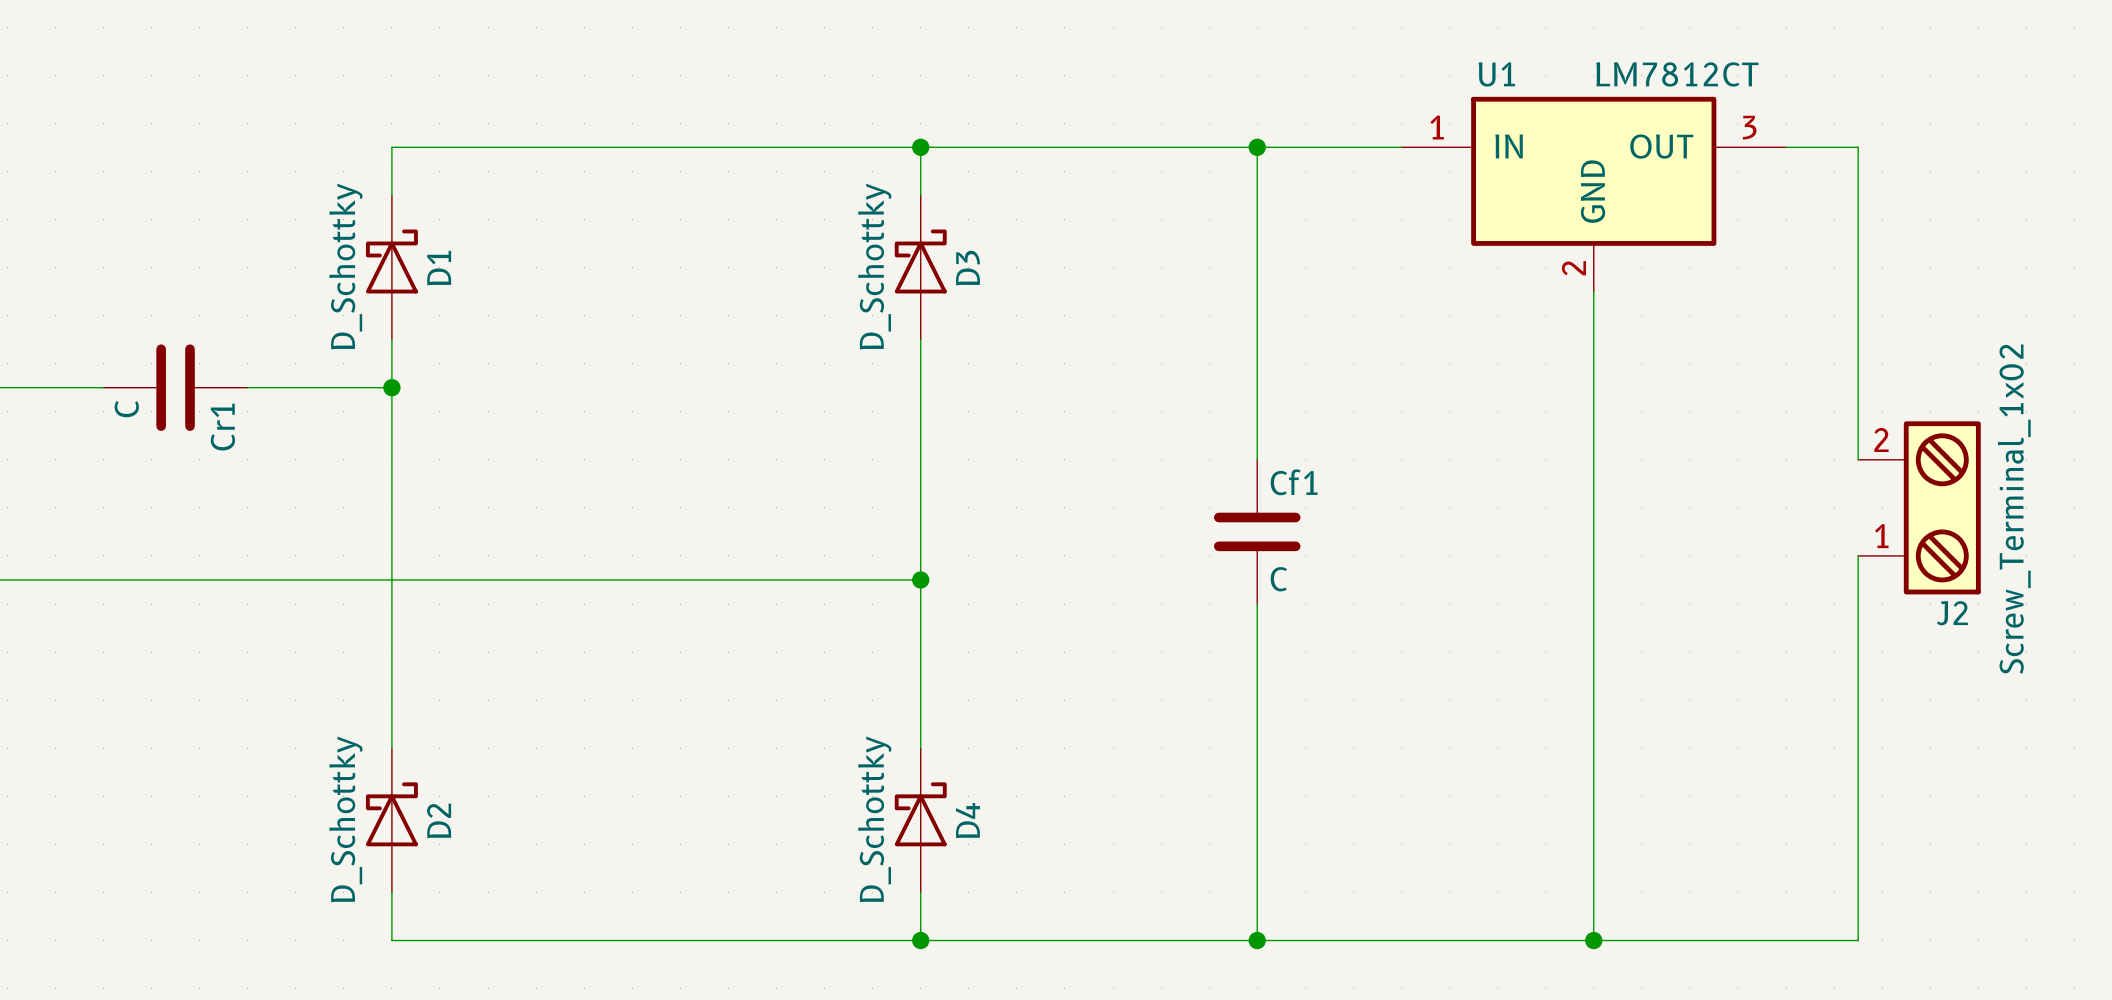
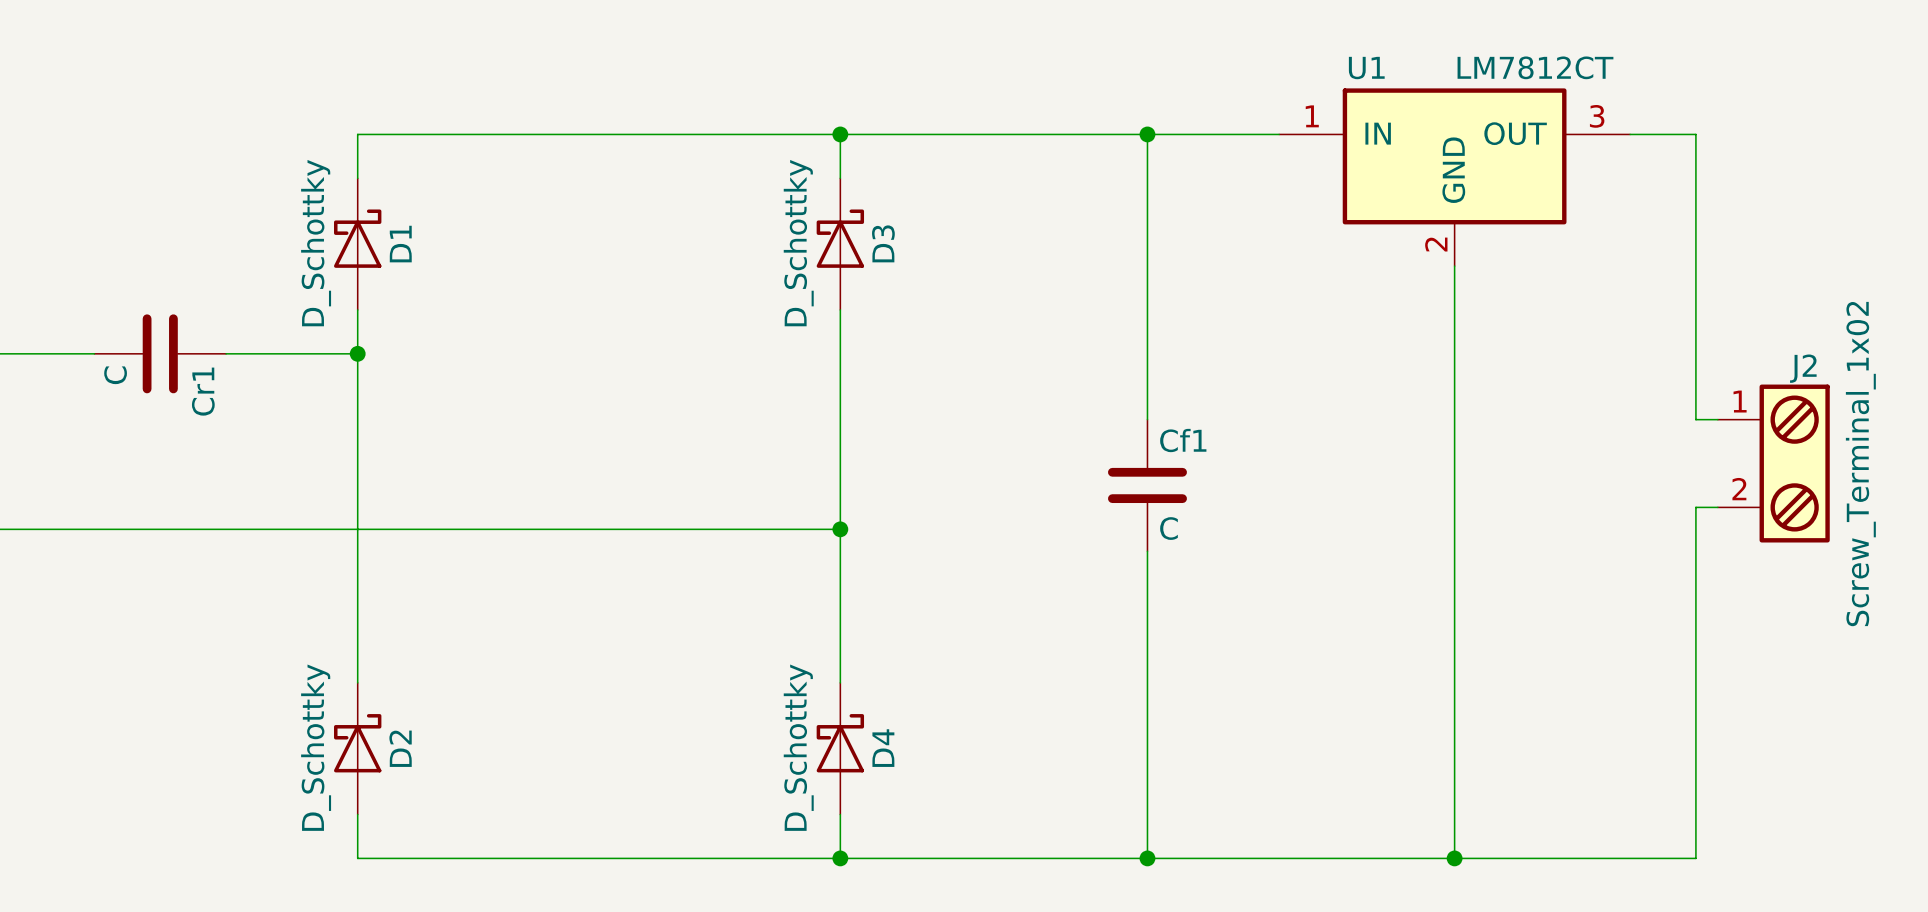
J2 flip: as is (1942, 507) -> up-down (1794, 463)

